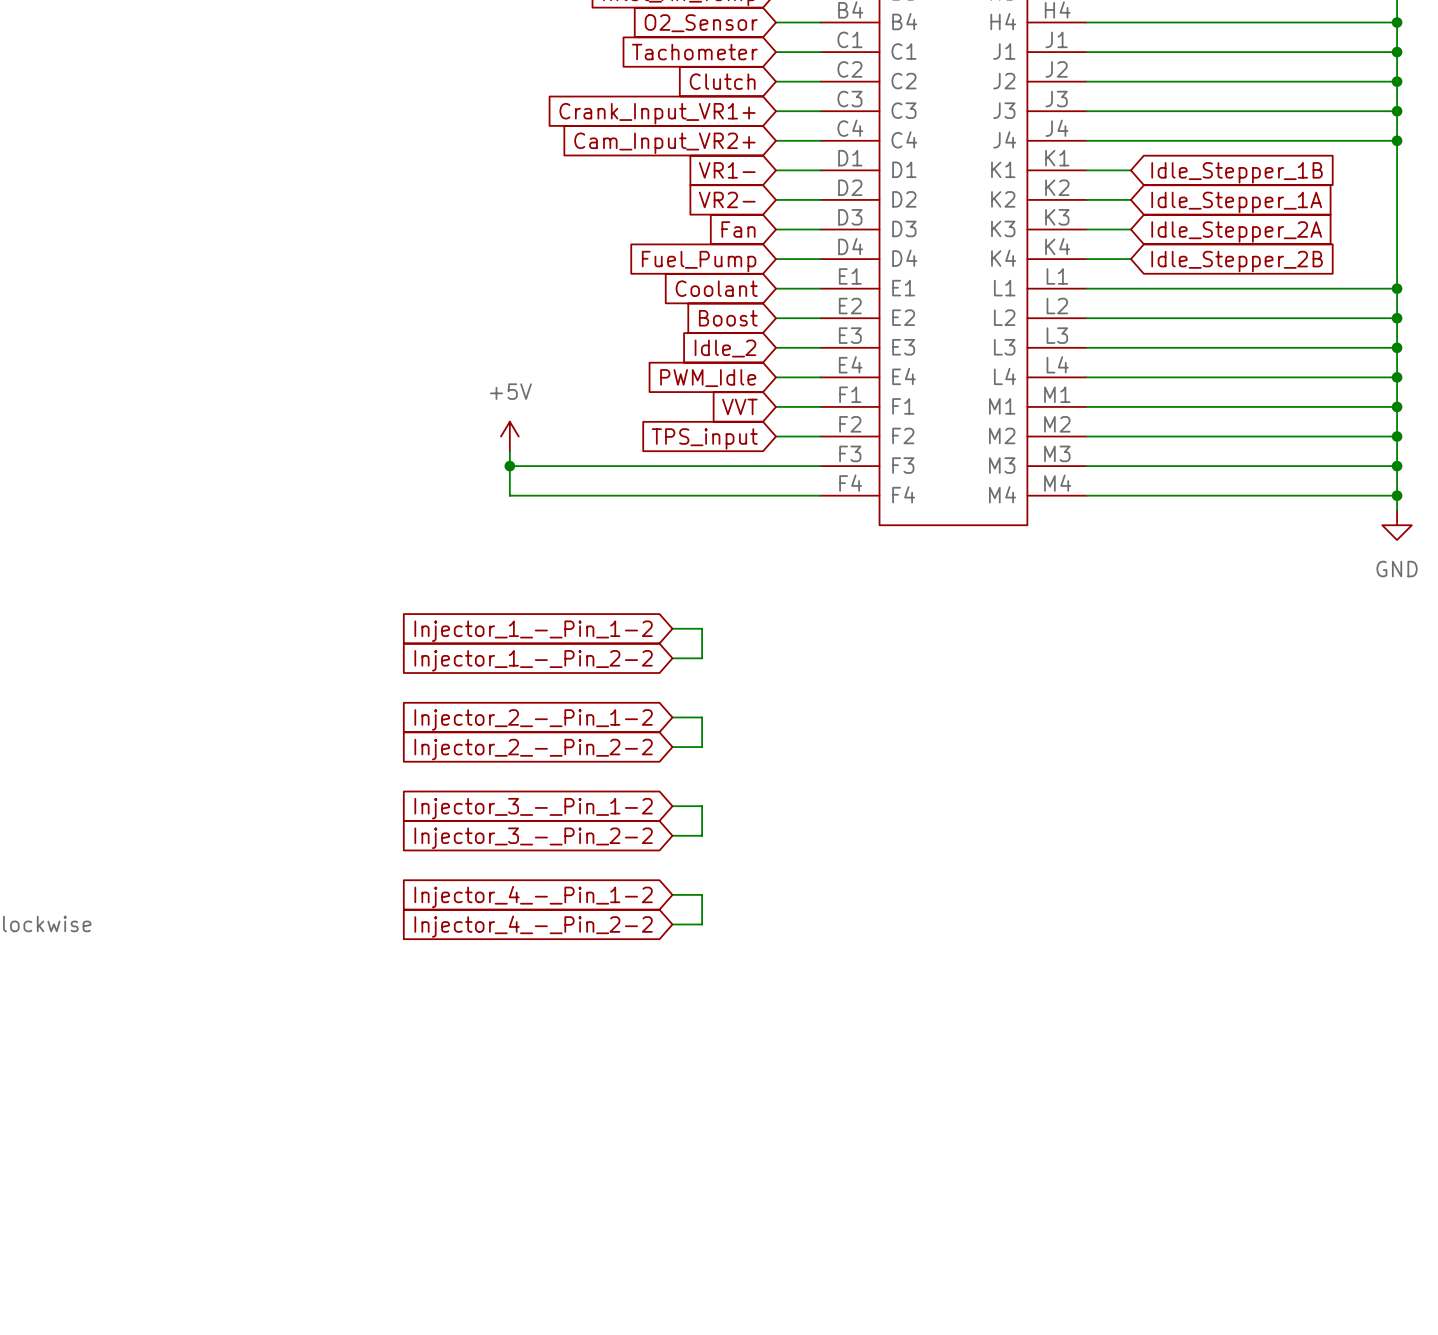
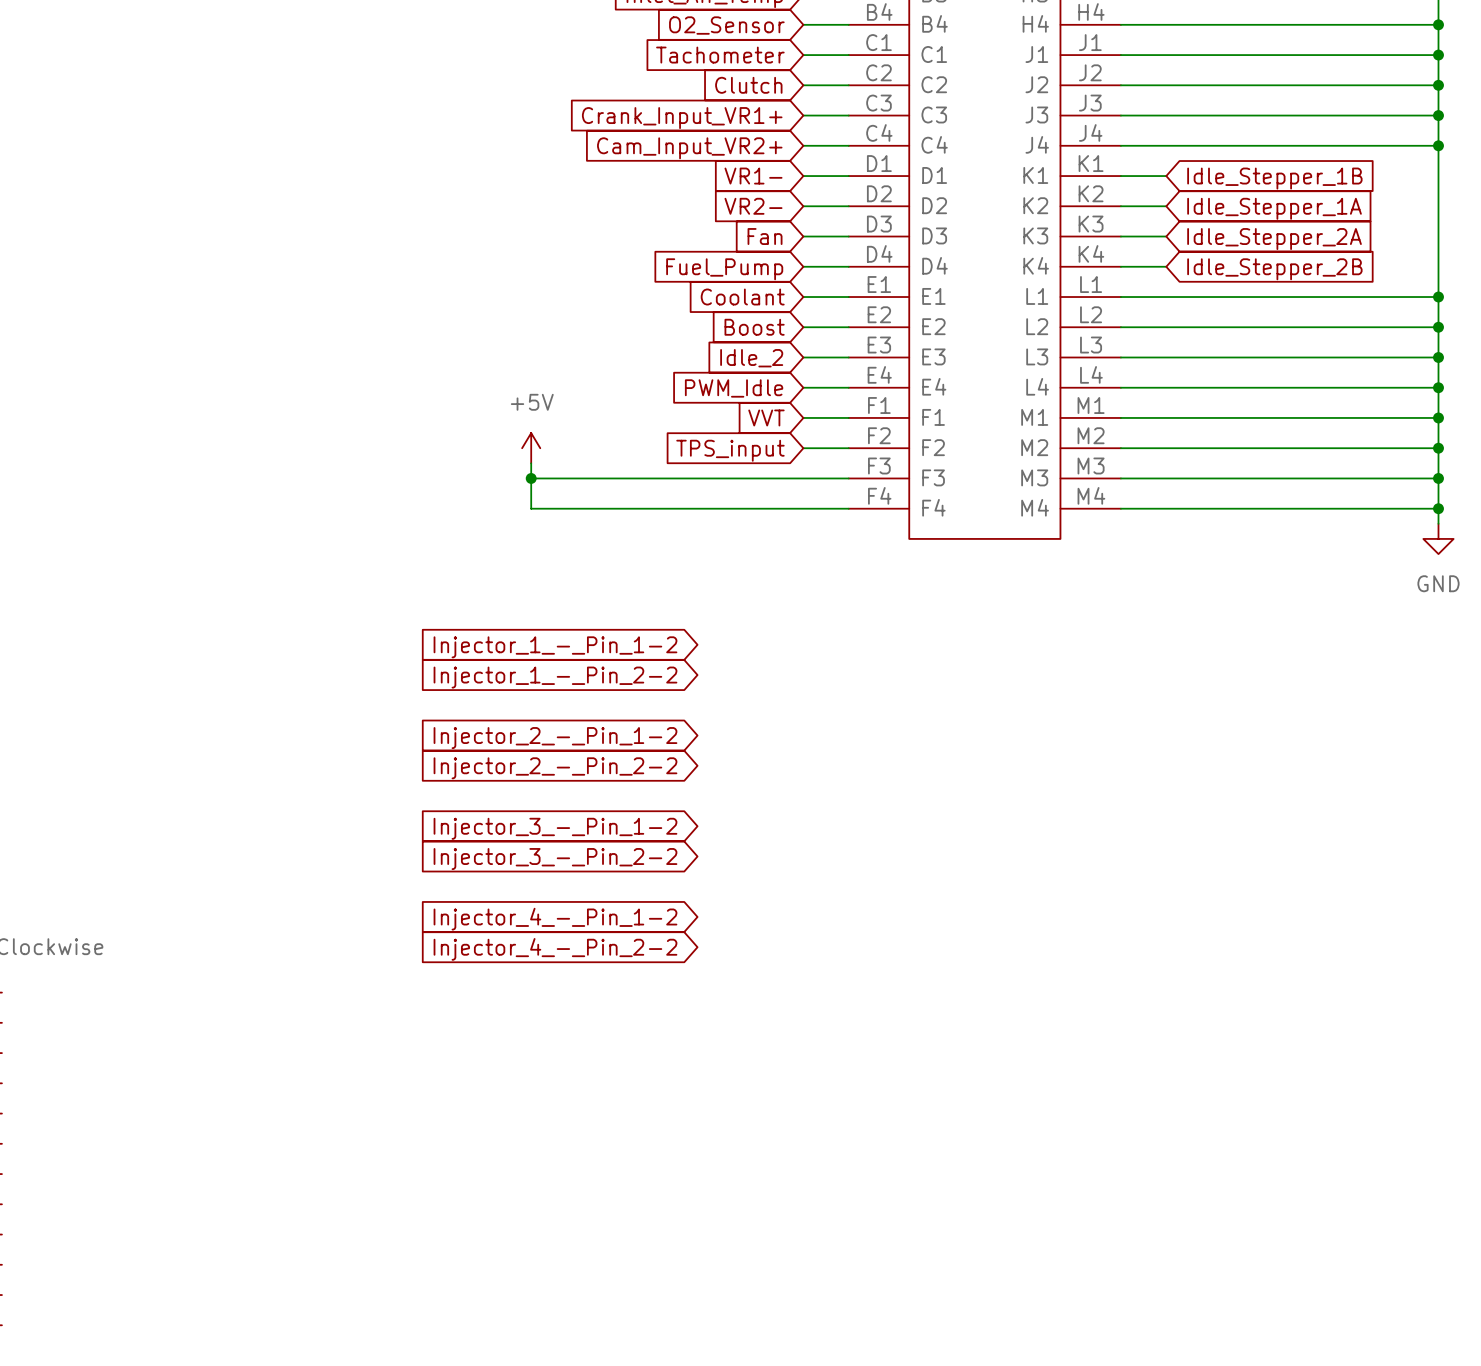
wire: (672, 628) (702, 628) (702, 658) (672, 658) -> none
wire: (672, 717) (702, 717) (702, 747) (672, 747) -> none
wire: (672, 806) (702, 806) (702, 835) (672, 835) -> none
wire: (672, 894) (702, 894) (702, 924) (672, 924) -> none

